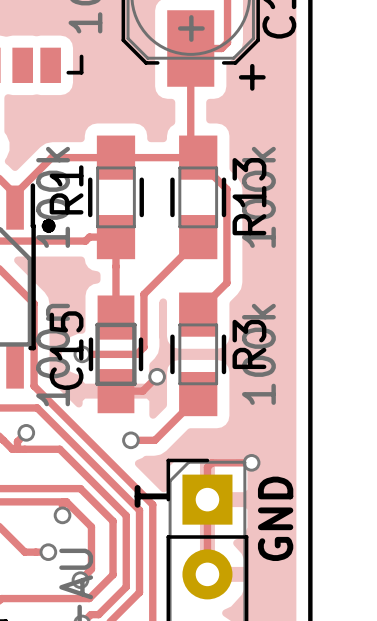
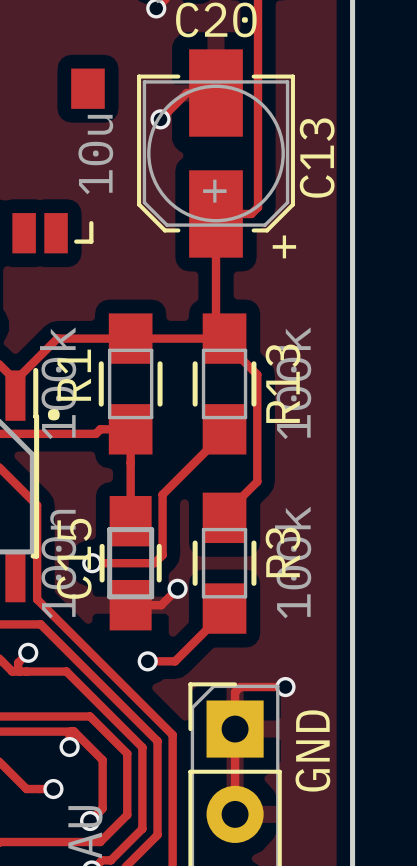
text: T (152, 496) -> none

